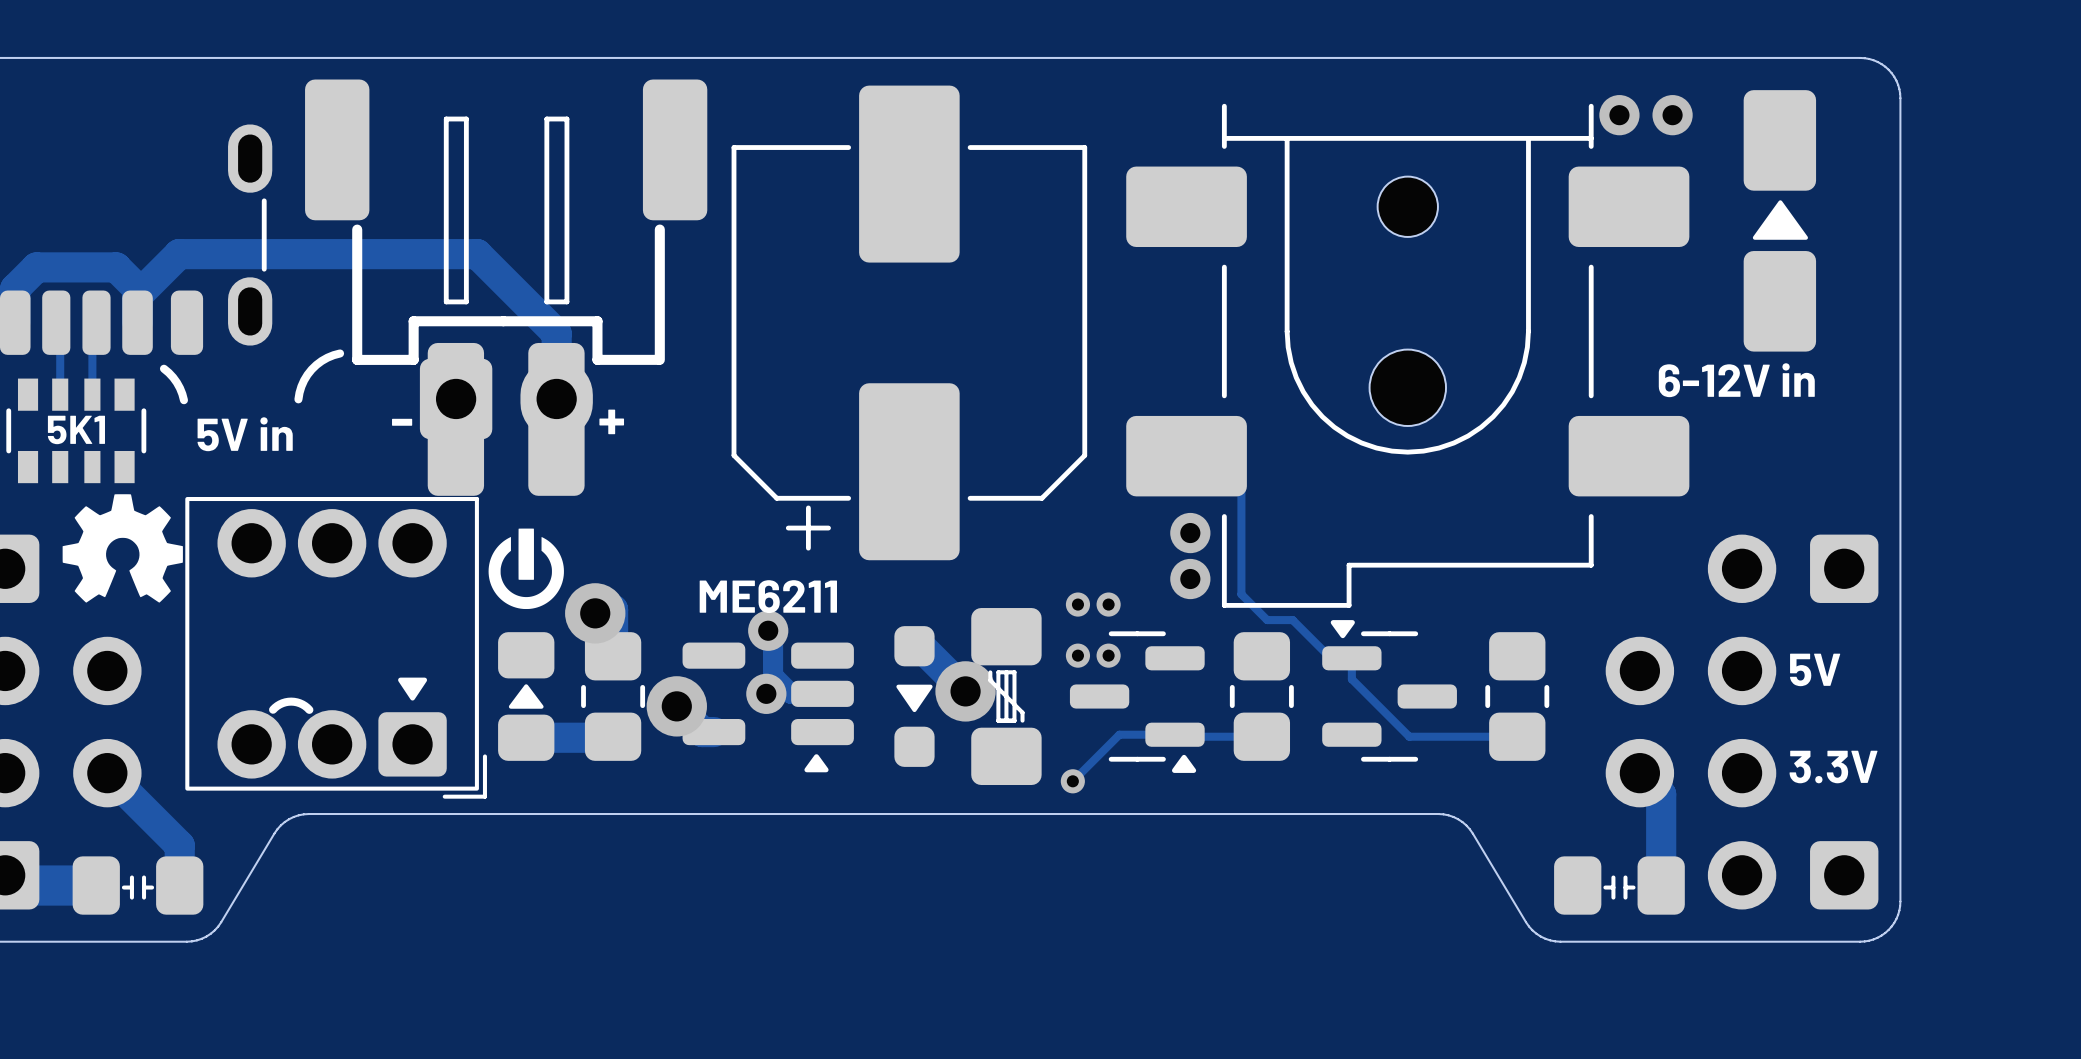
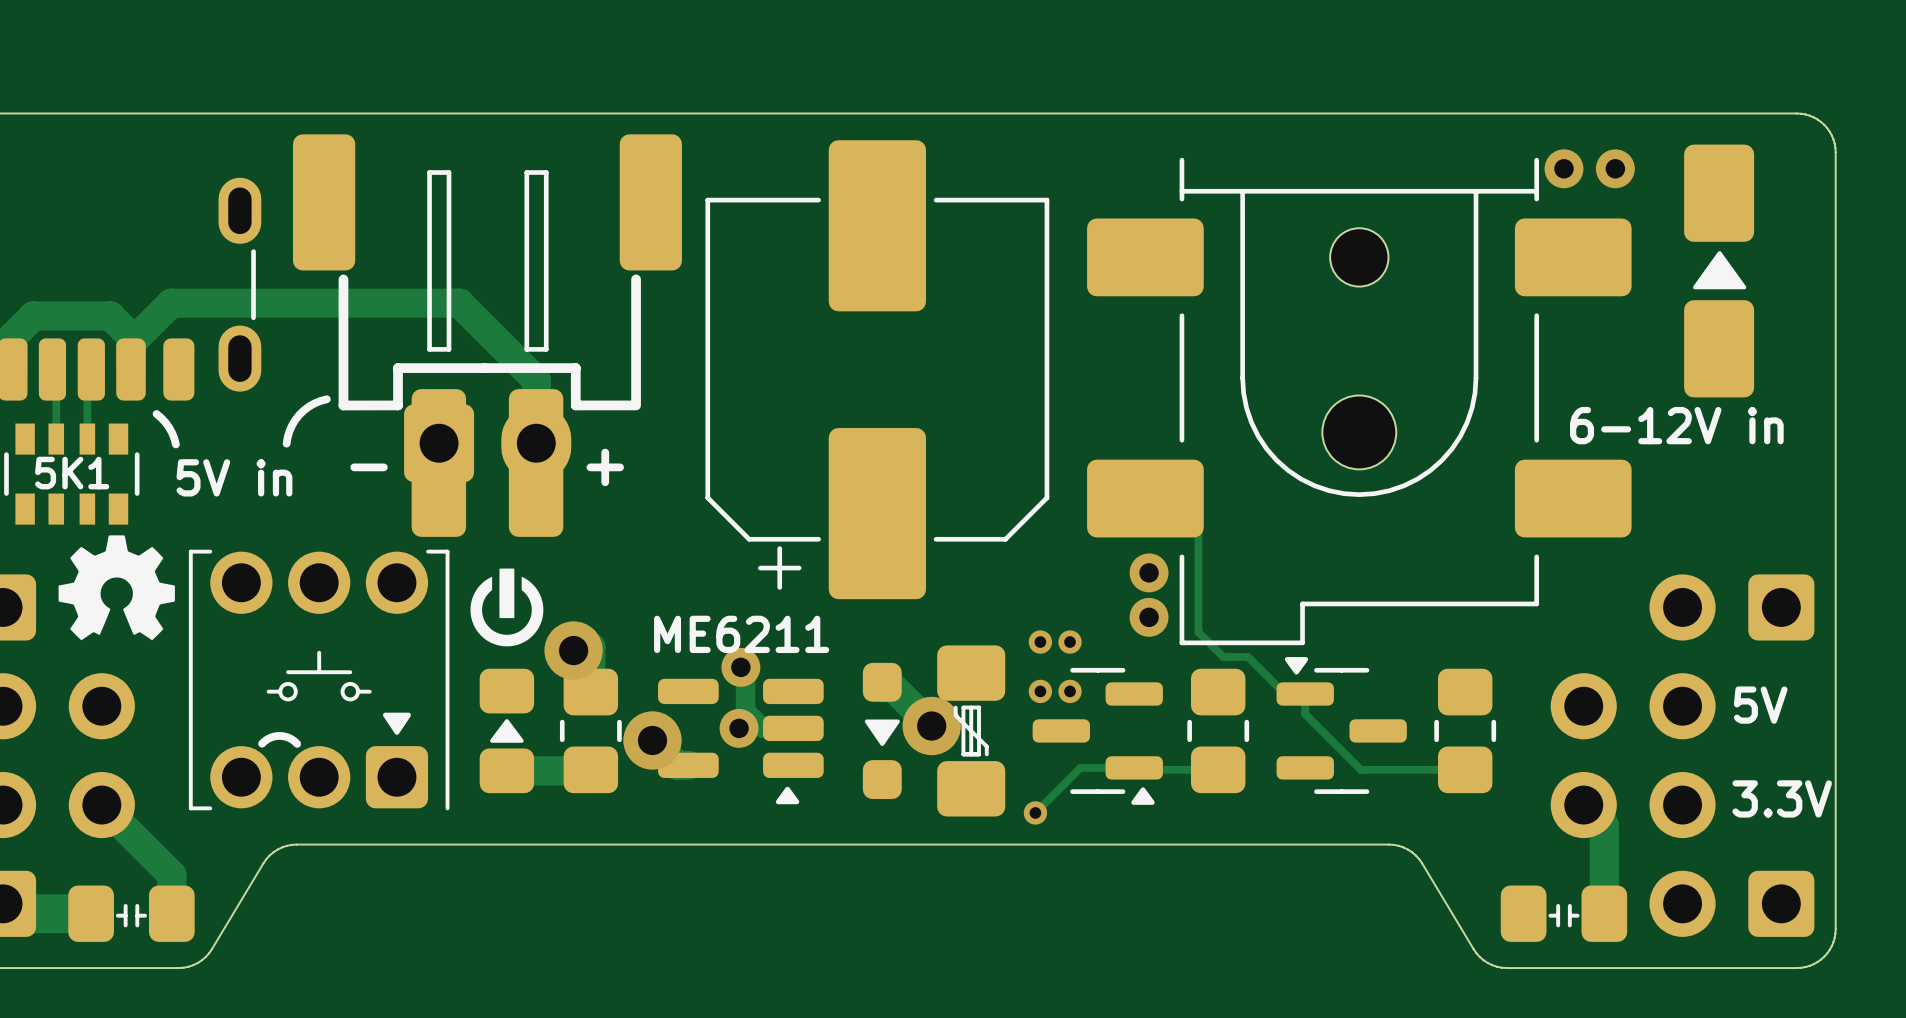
part footprint: [185, 497, 487, 799] -> [188, 549, 450, 811]

